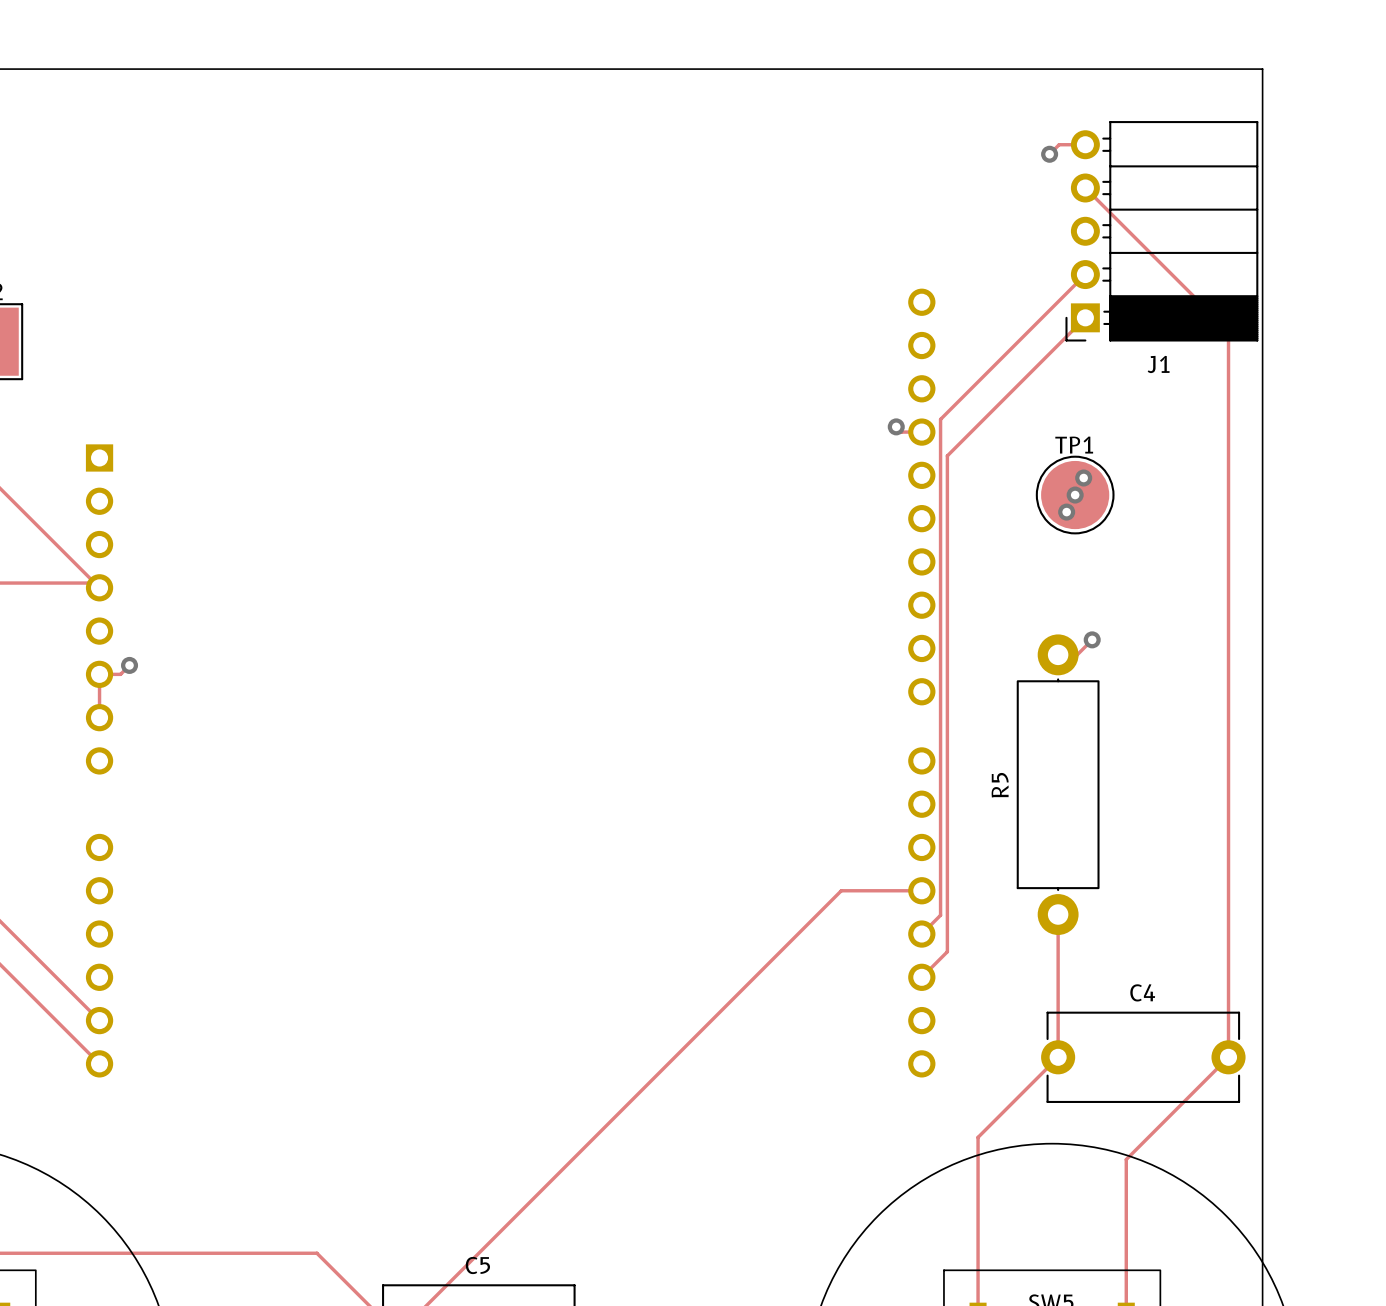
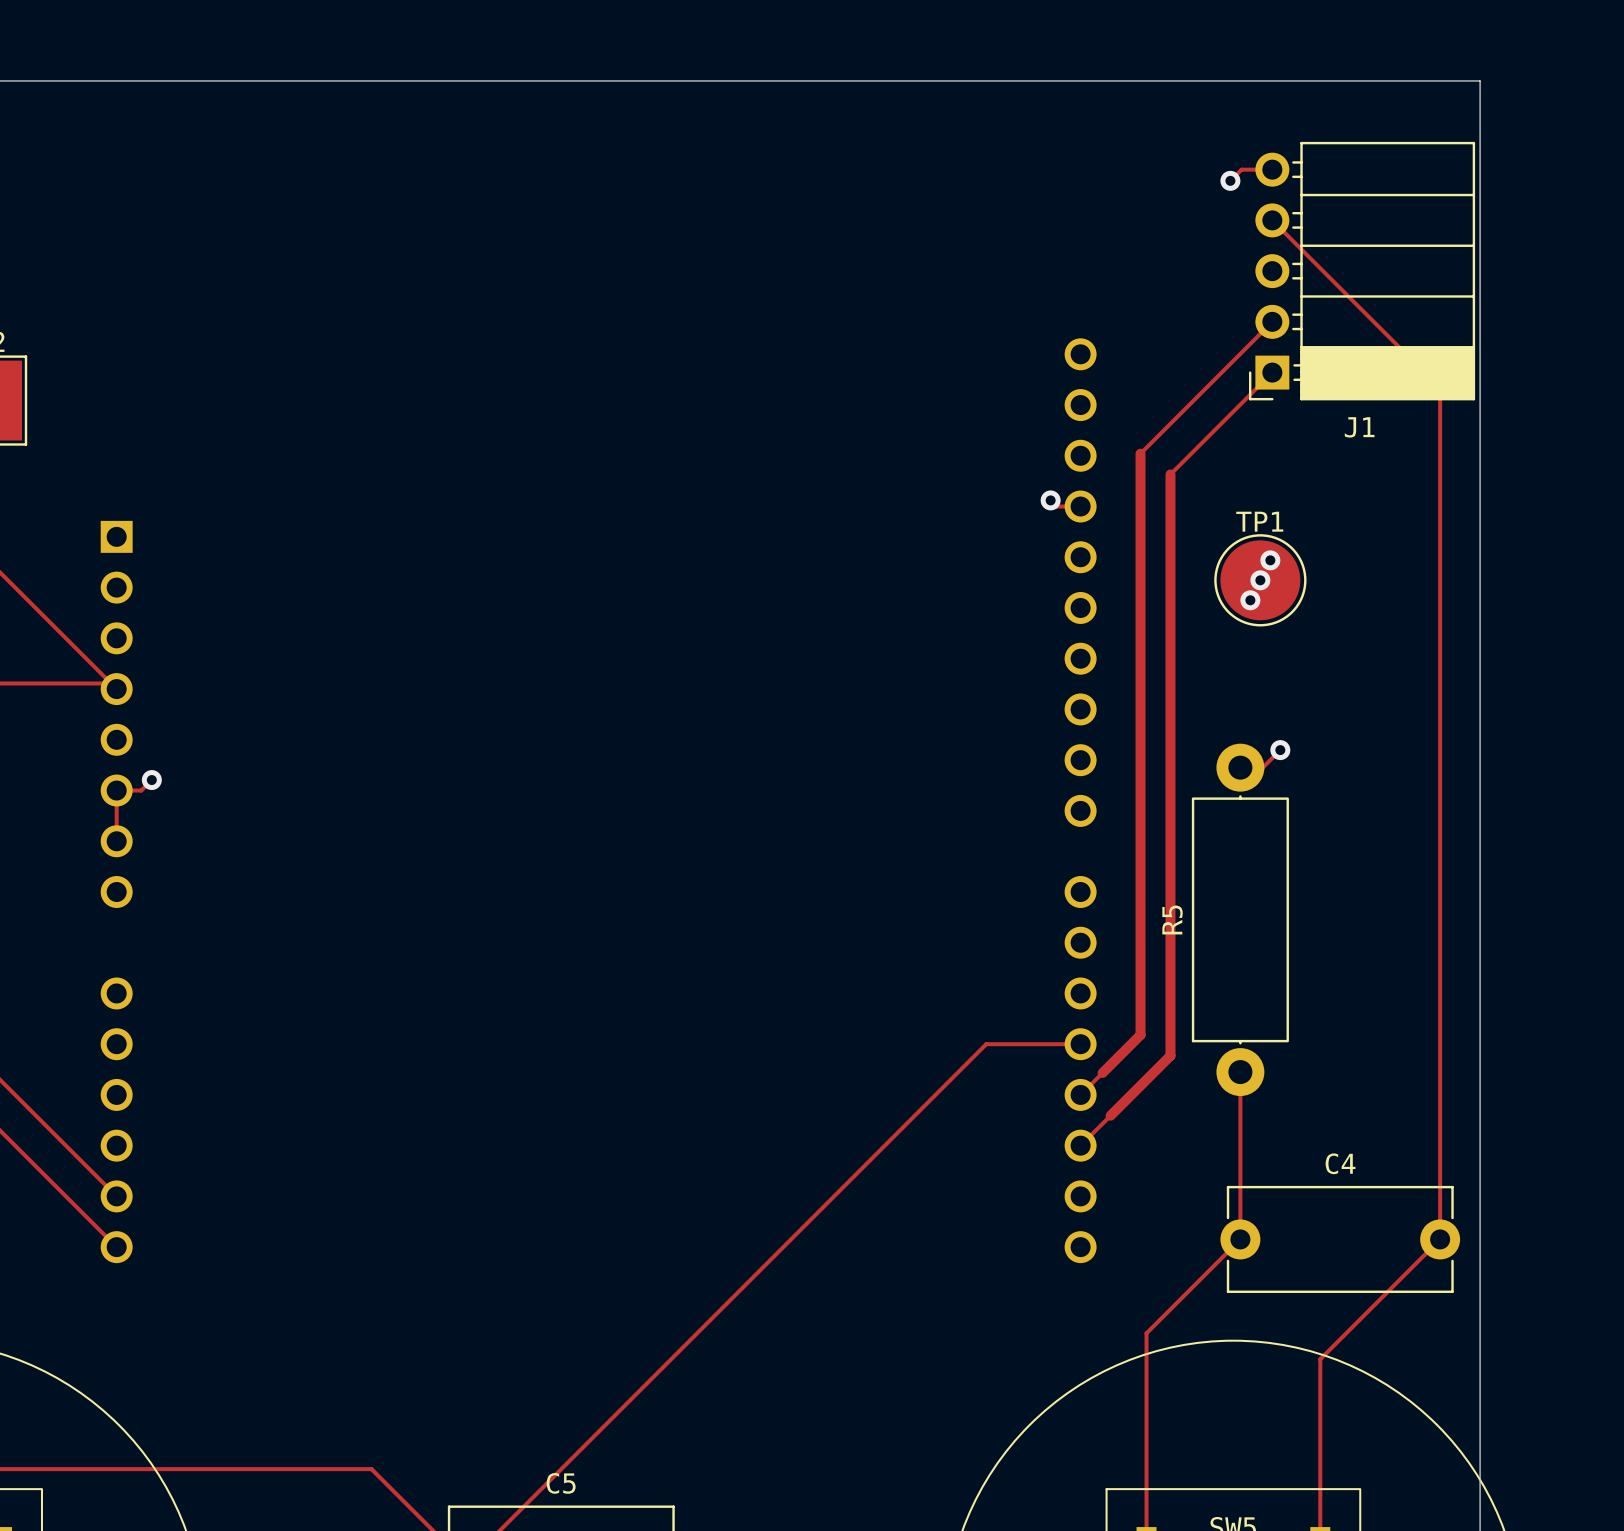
track: (972, 387) (940, 419) (940, 915) -> (1140, 453) (1140, 1035) (1102, 1072)
track: (998, 404) (947, 455) (947, 951) -> (1170, 474) (1170, 1055) (1110, 1115)

